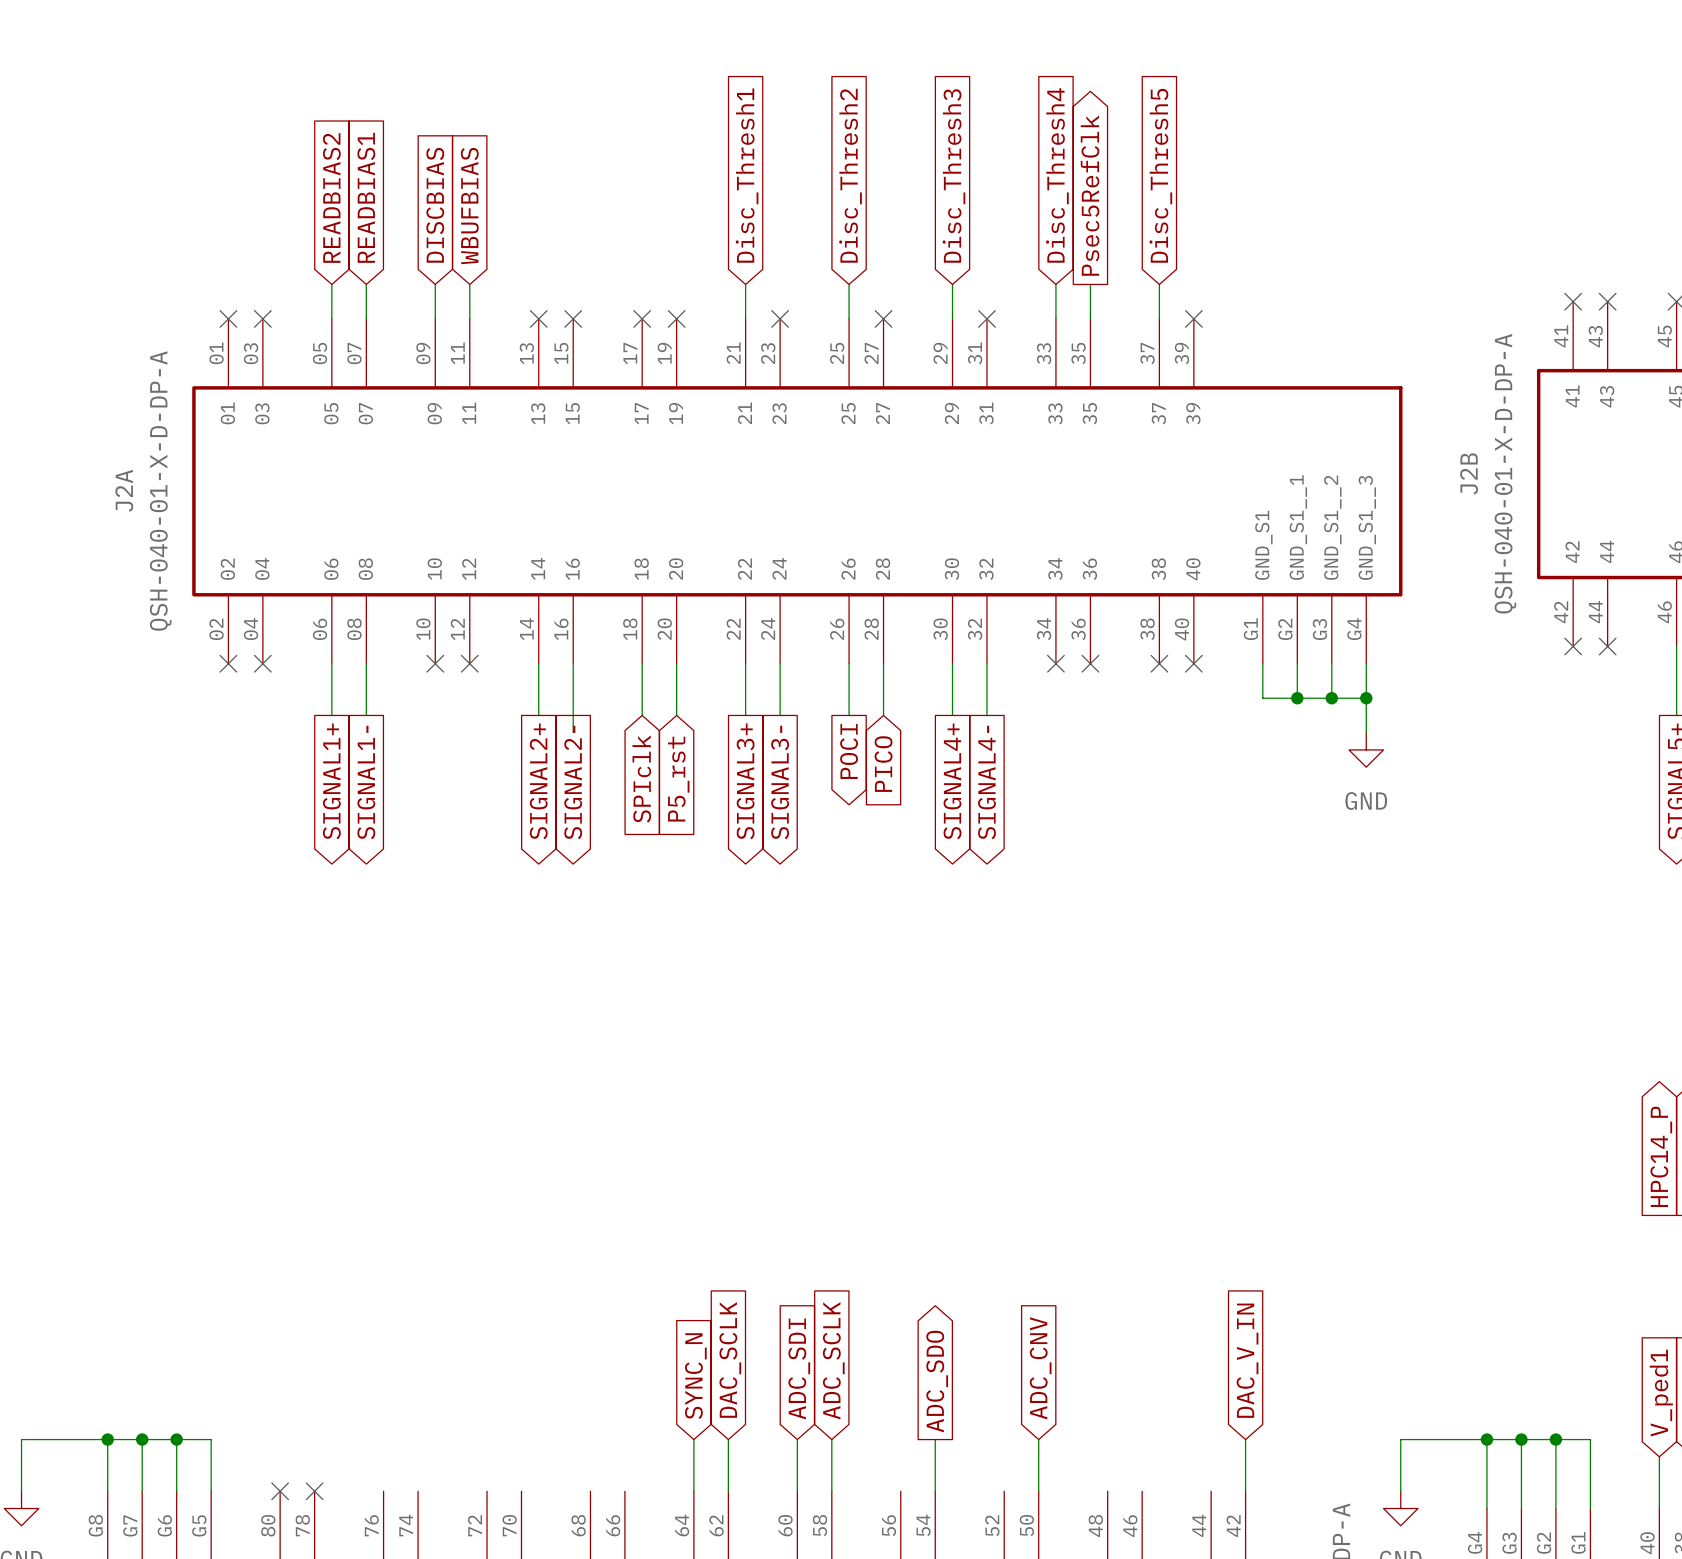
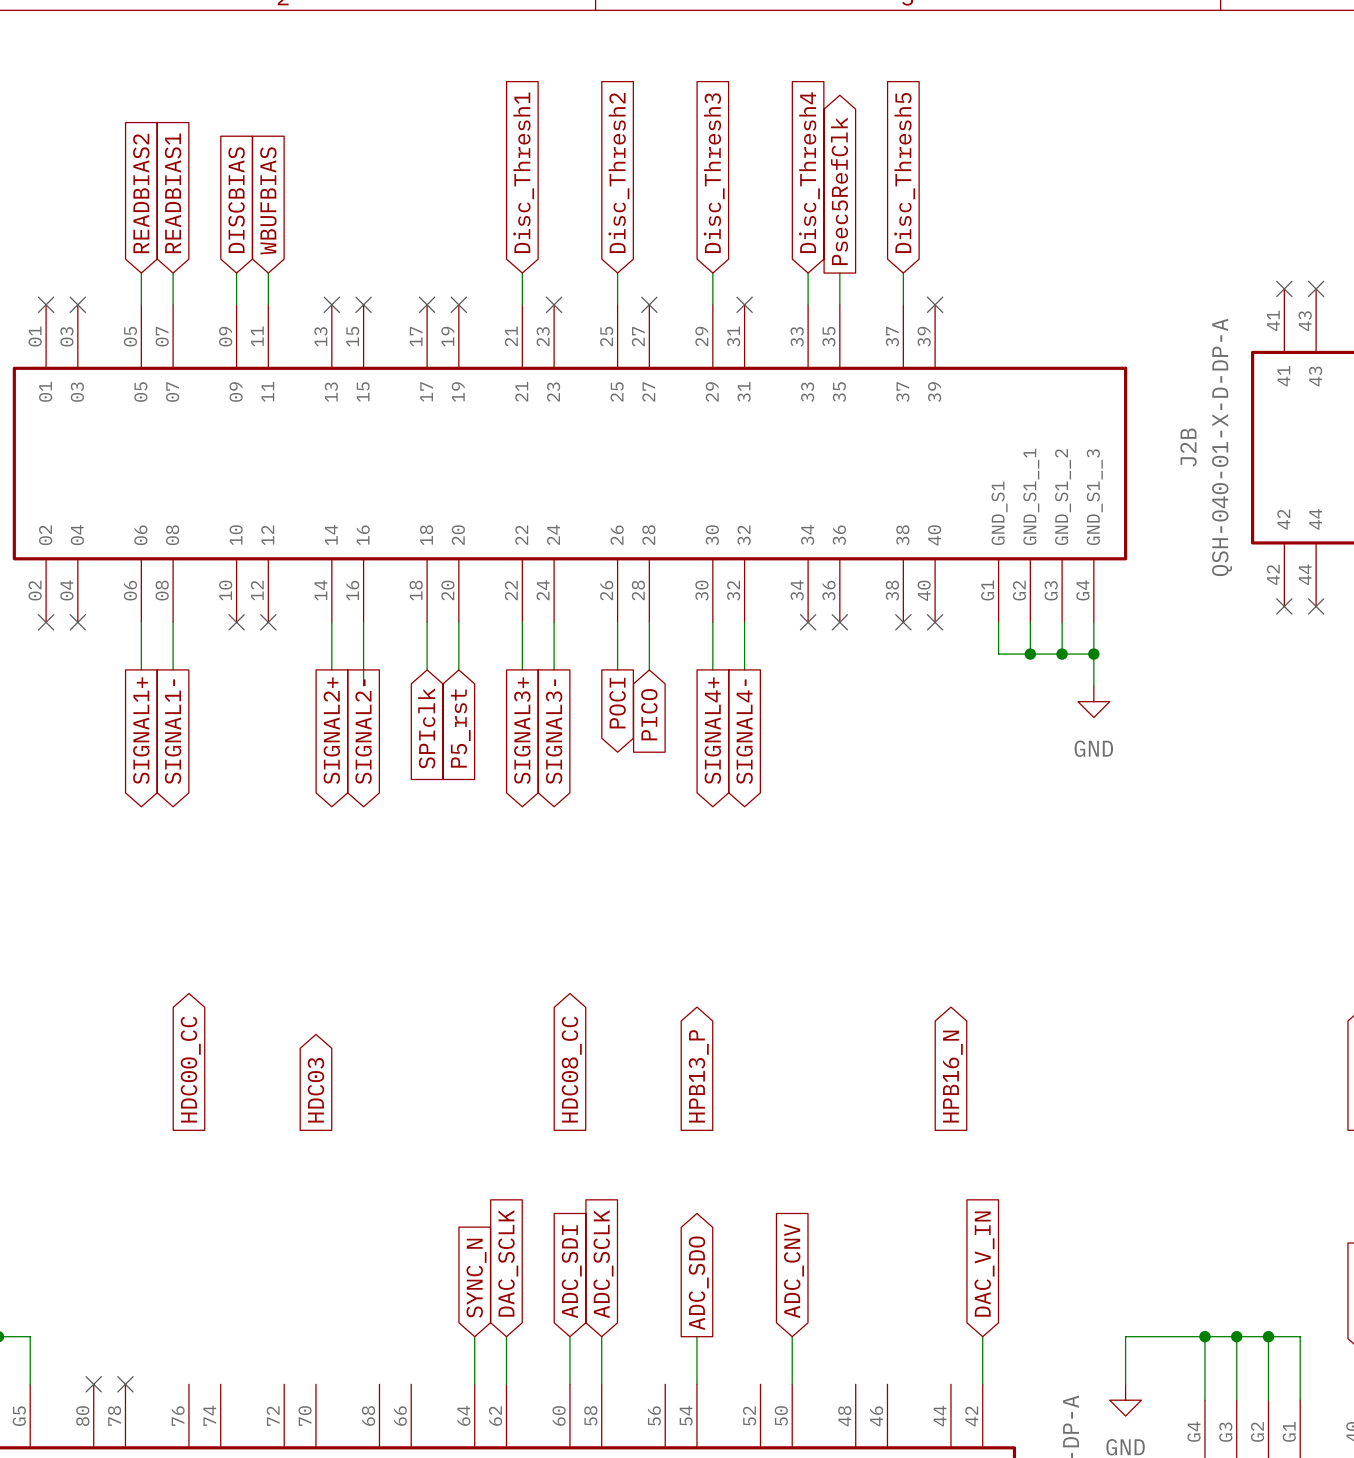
global label: none -> HDC00_CC (190, 1069)
global label: none -> HDC08_CC (571, 1069)
global label: none -> HPB13_P (698, 1076)
global label: none -> HPB16_N (952, 1076)
global label: none -> HDC03 (315, 1090)

